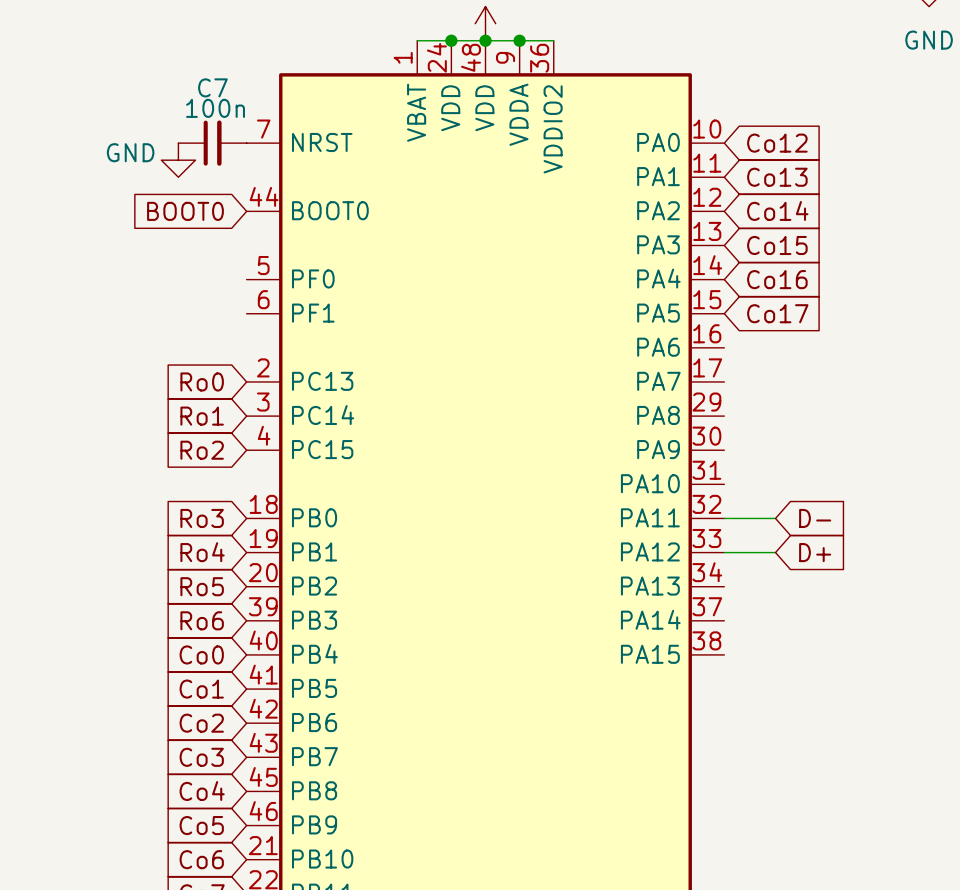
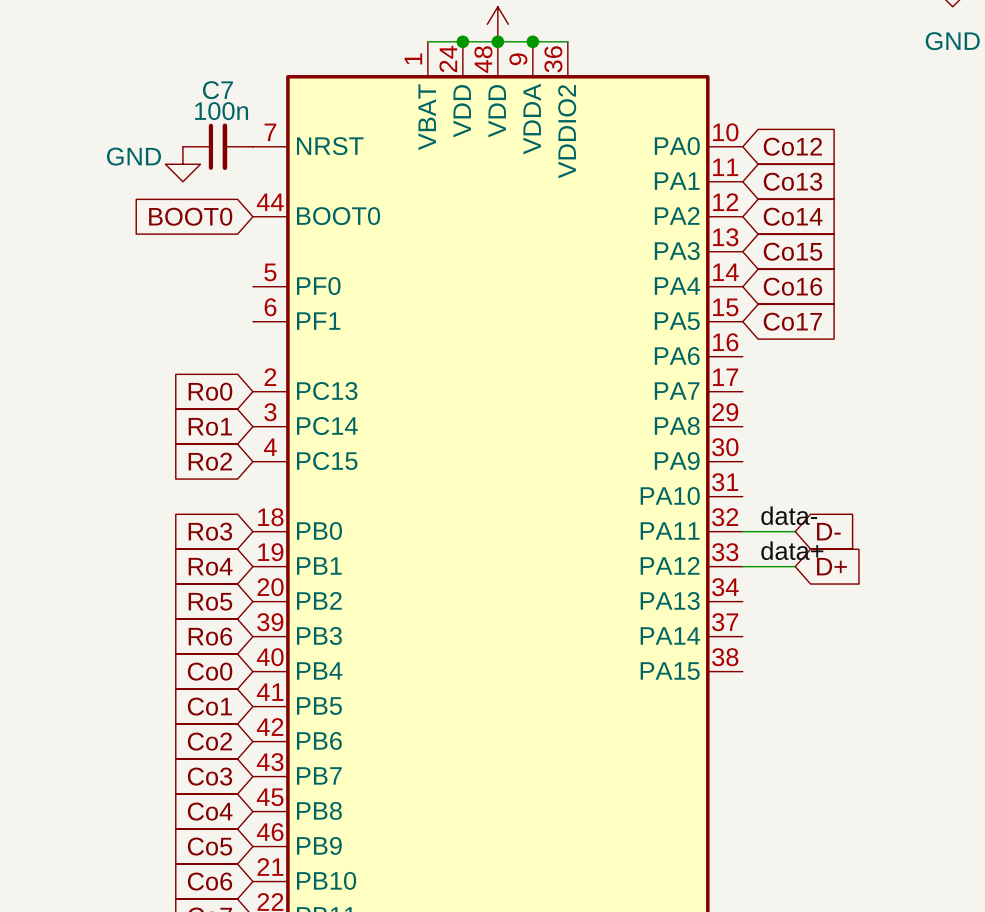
label: none -> data- (789, 515)
label: none -> data+ (792, 550)

